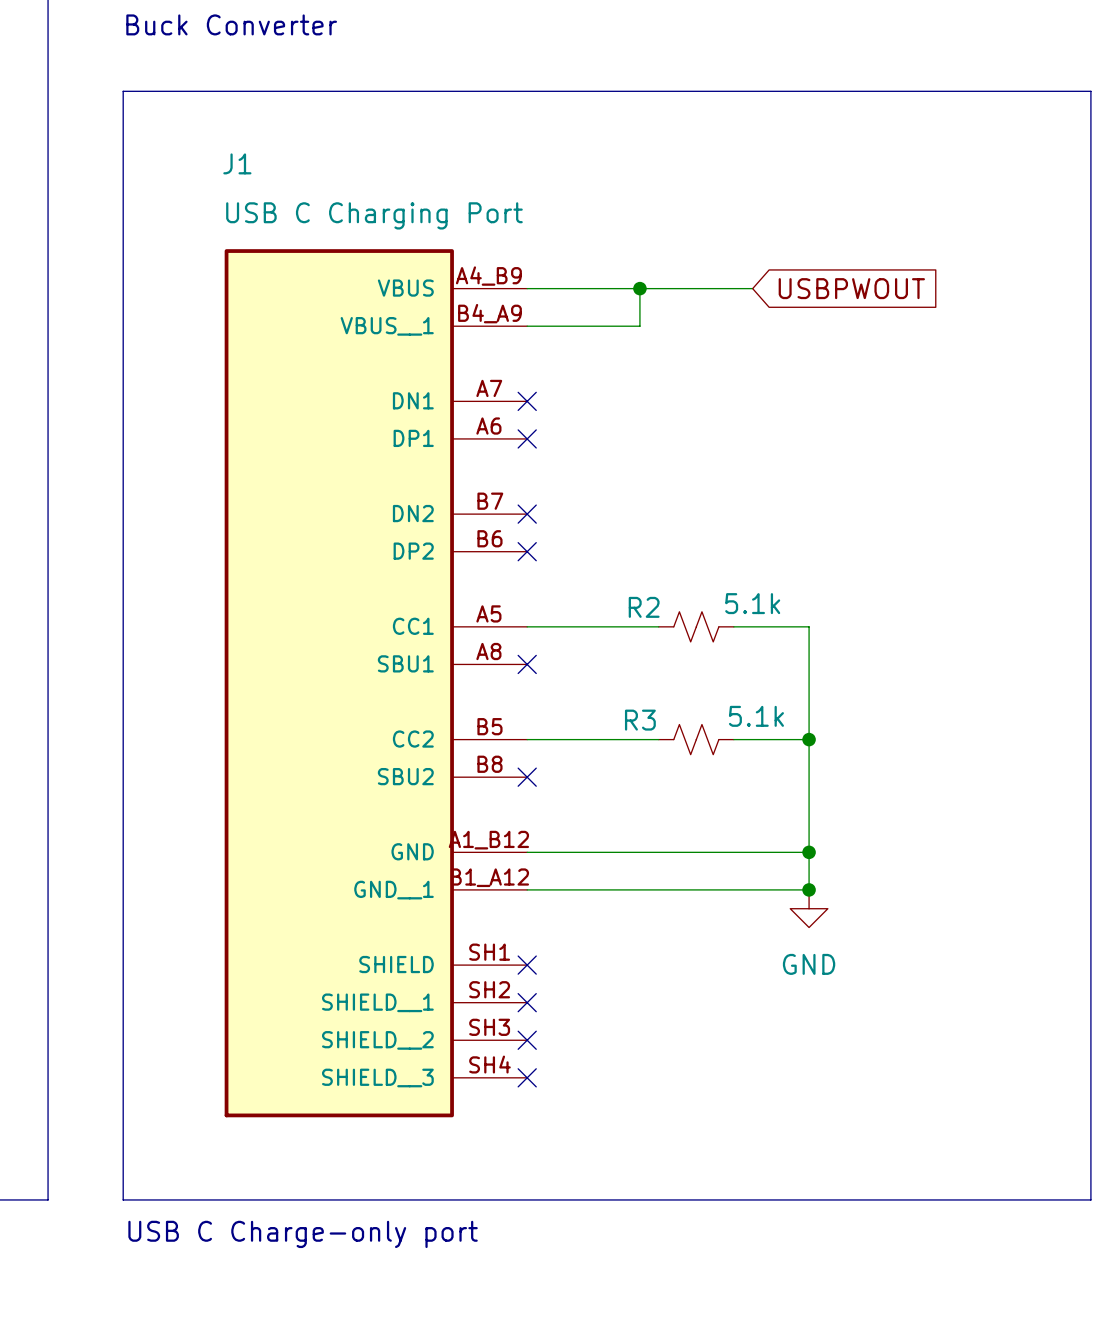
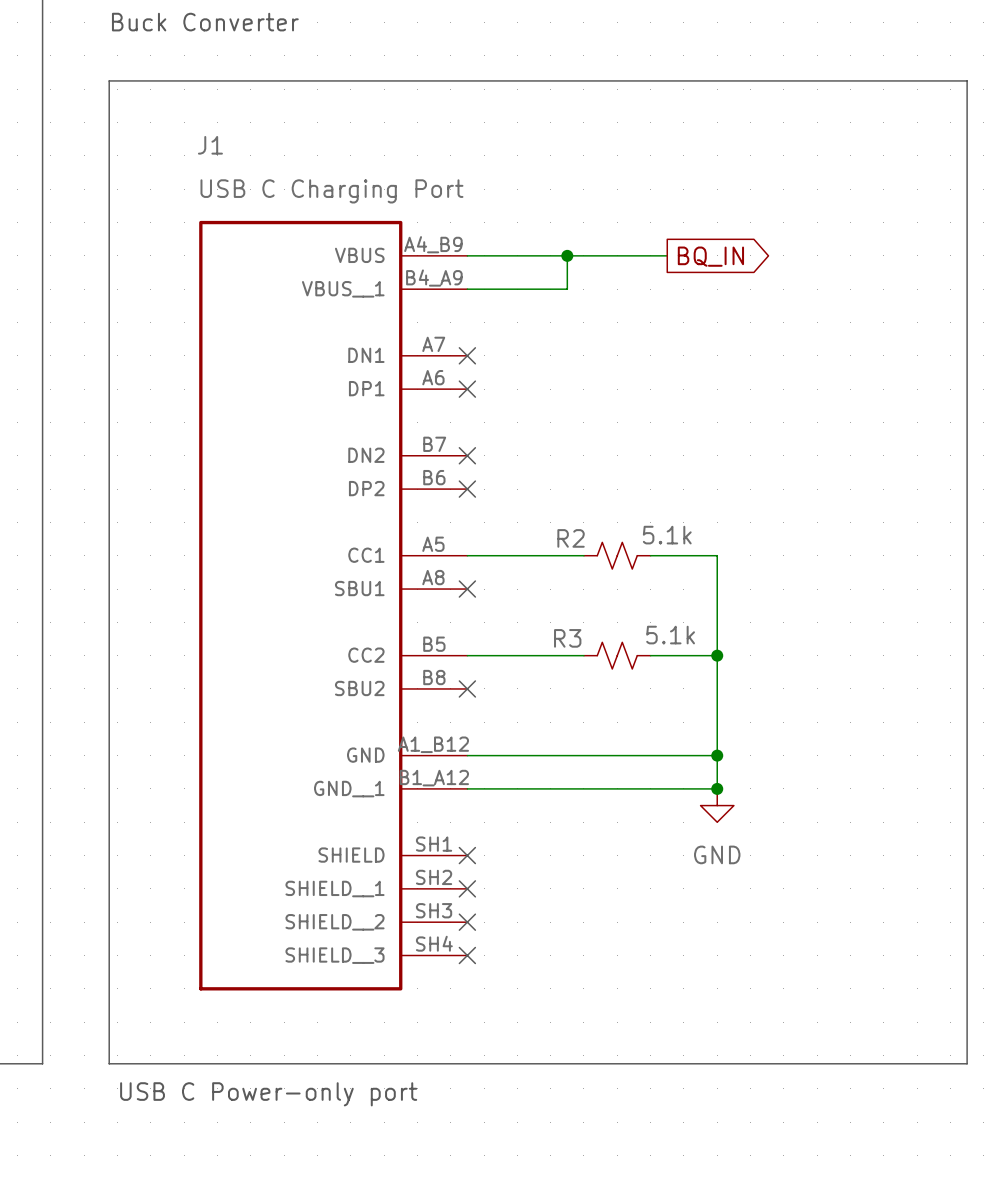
global label shape: input (851, 288) -> output (710, 256)
global label: USBPWOUT (851, 288) -> BQ_IN (710, 256)
text: USB C Charge-only port (303, 1234) -> USB C Power-only port (268, 1094)

